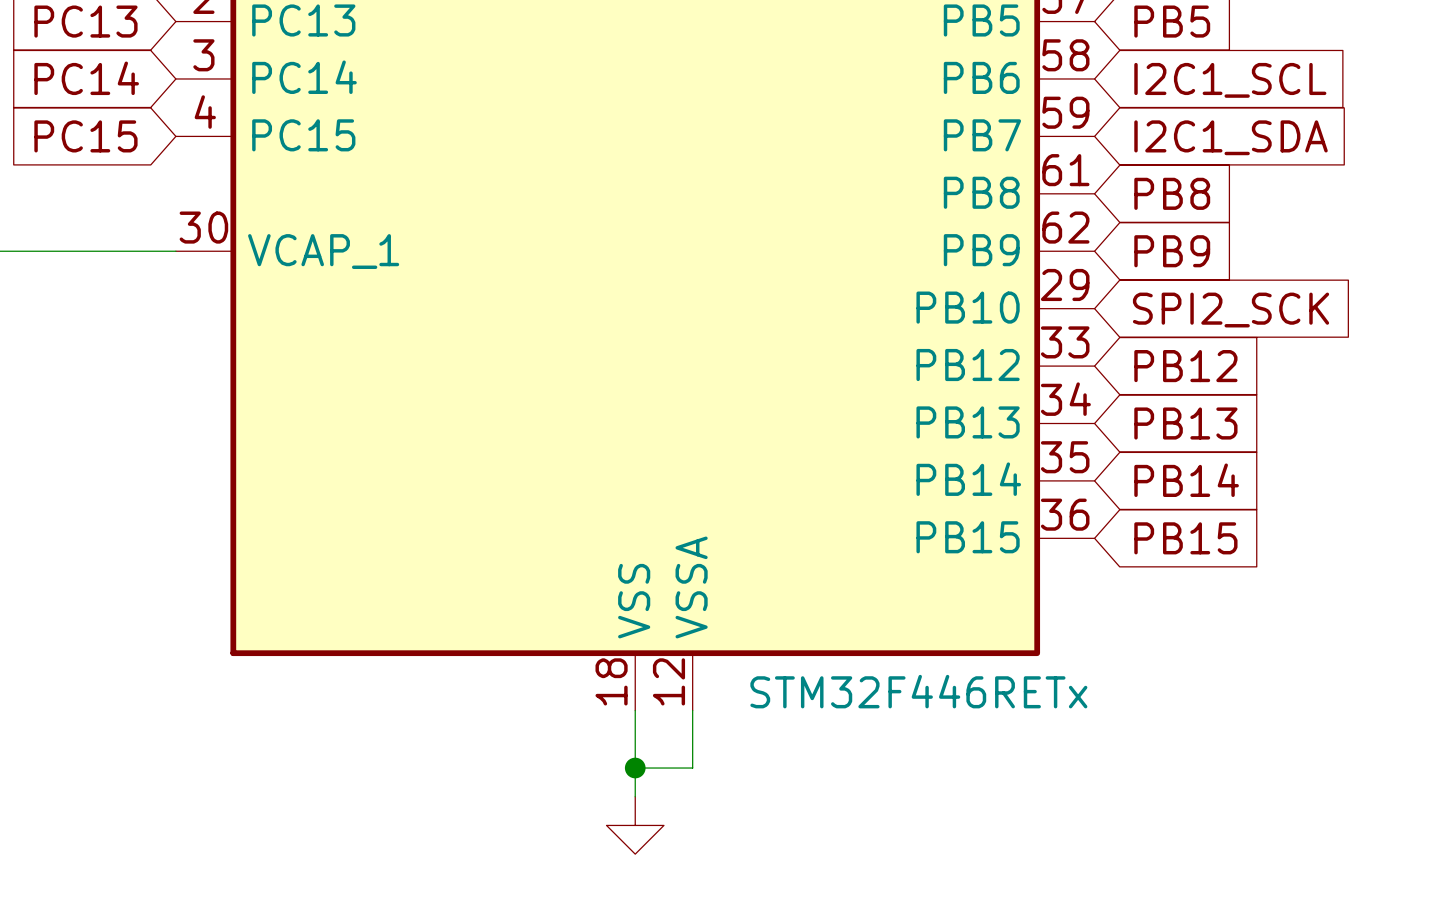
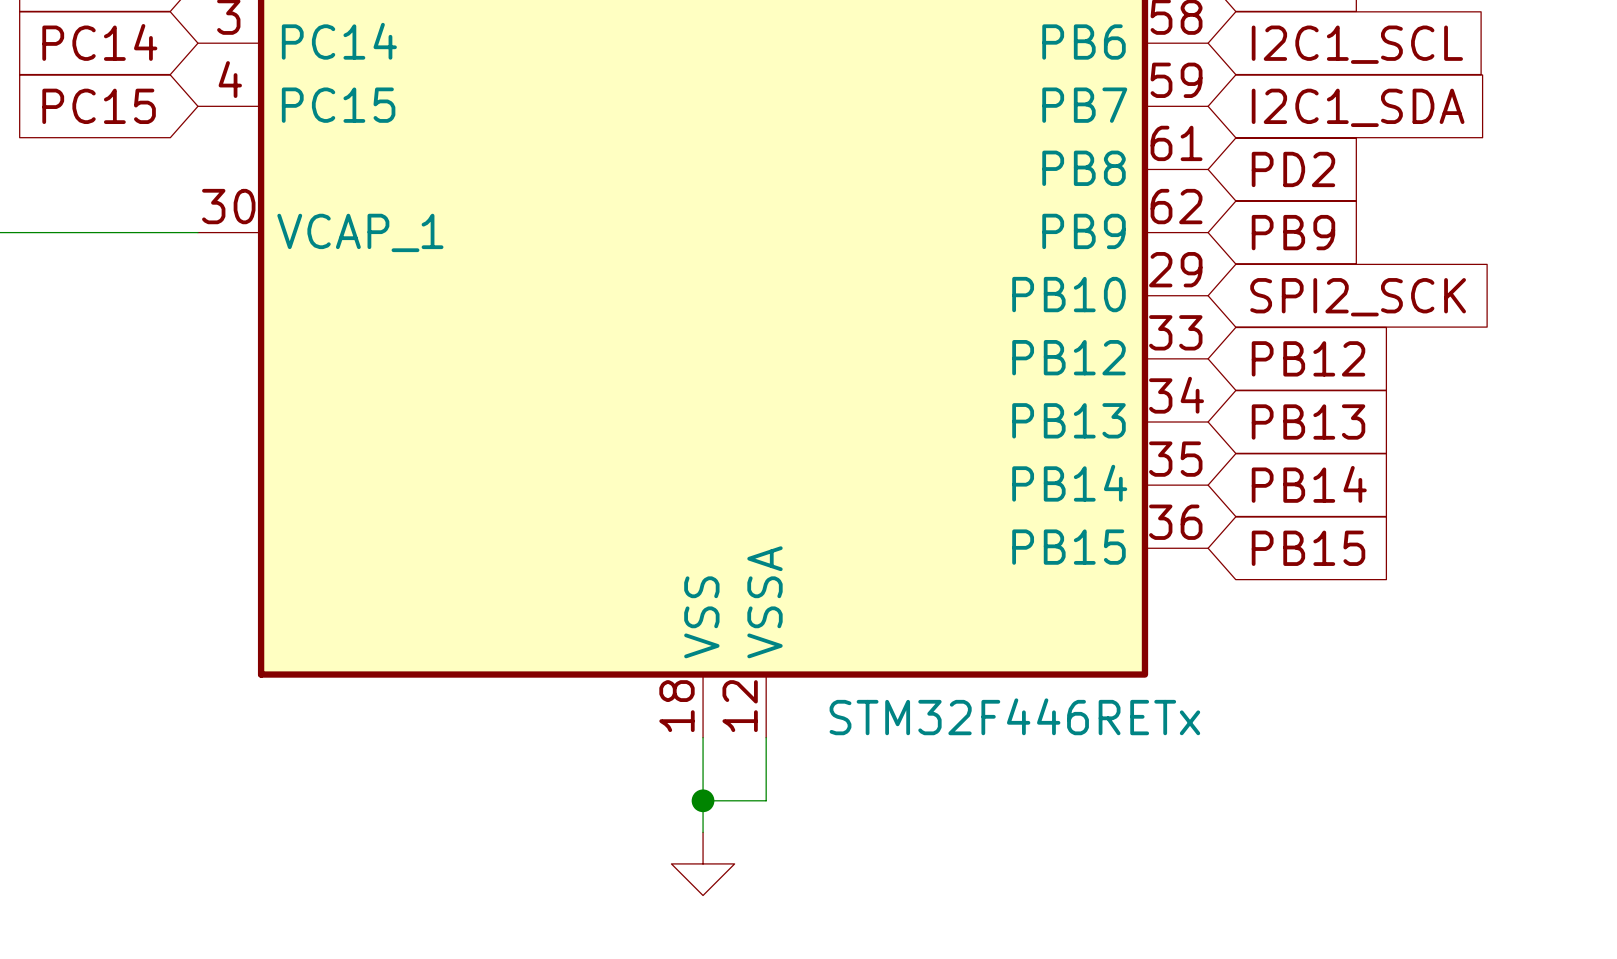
global label: PB8 (1172, 193) -> PD2 (1293, 169)

